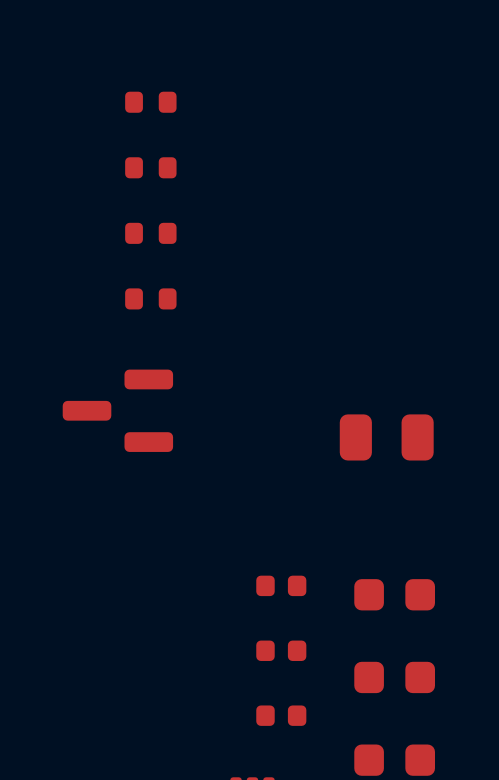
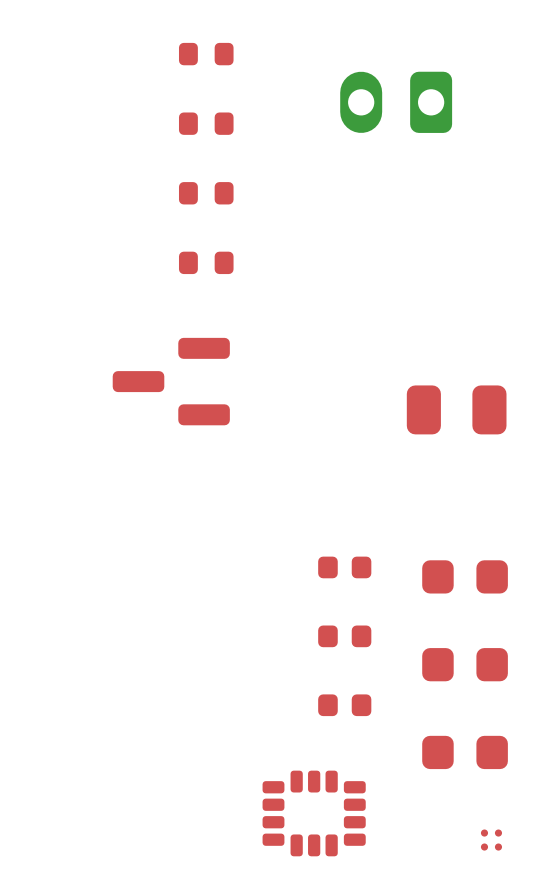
part: none -> (396, 102)

